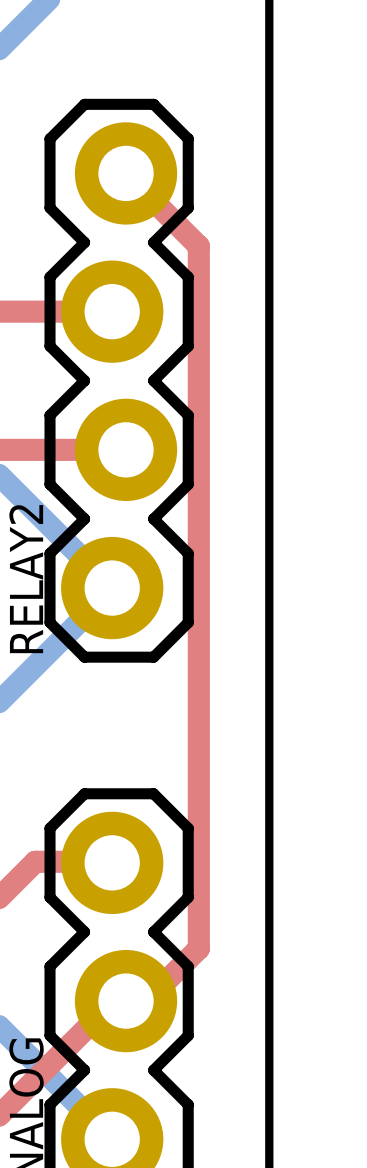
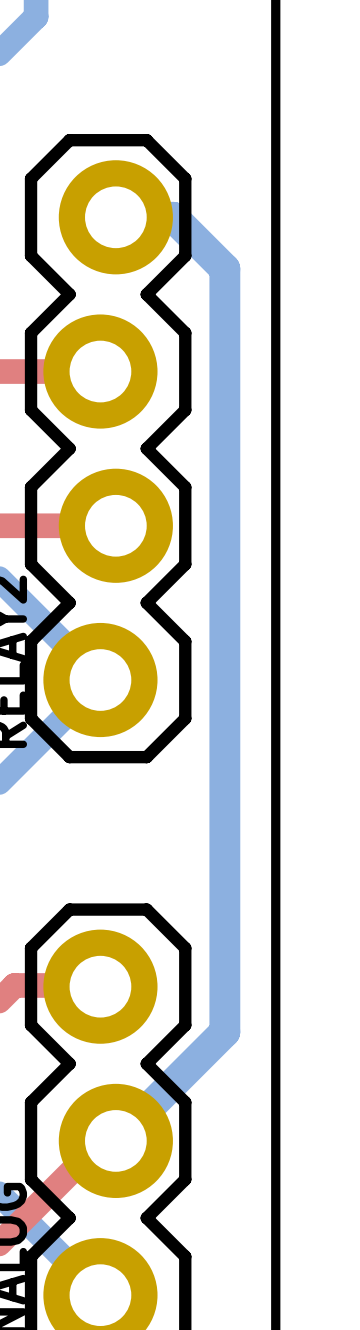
bottom track: none -> (115, 217) (173, 217) (224, 268) (224, 1031) (115, 1140)
top track: (126, 173) (198, 246) (198, 948) (146, 1001) -> none

